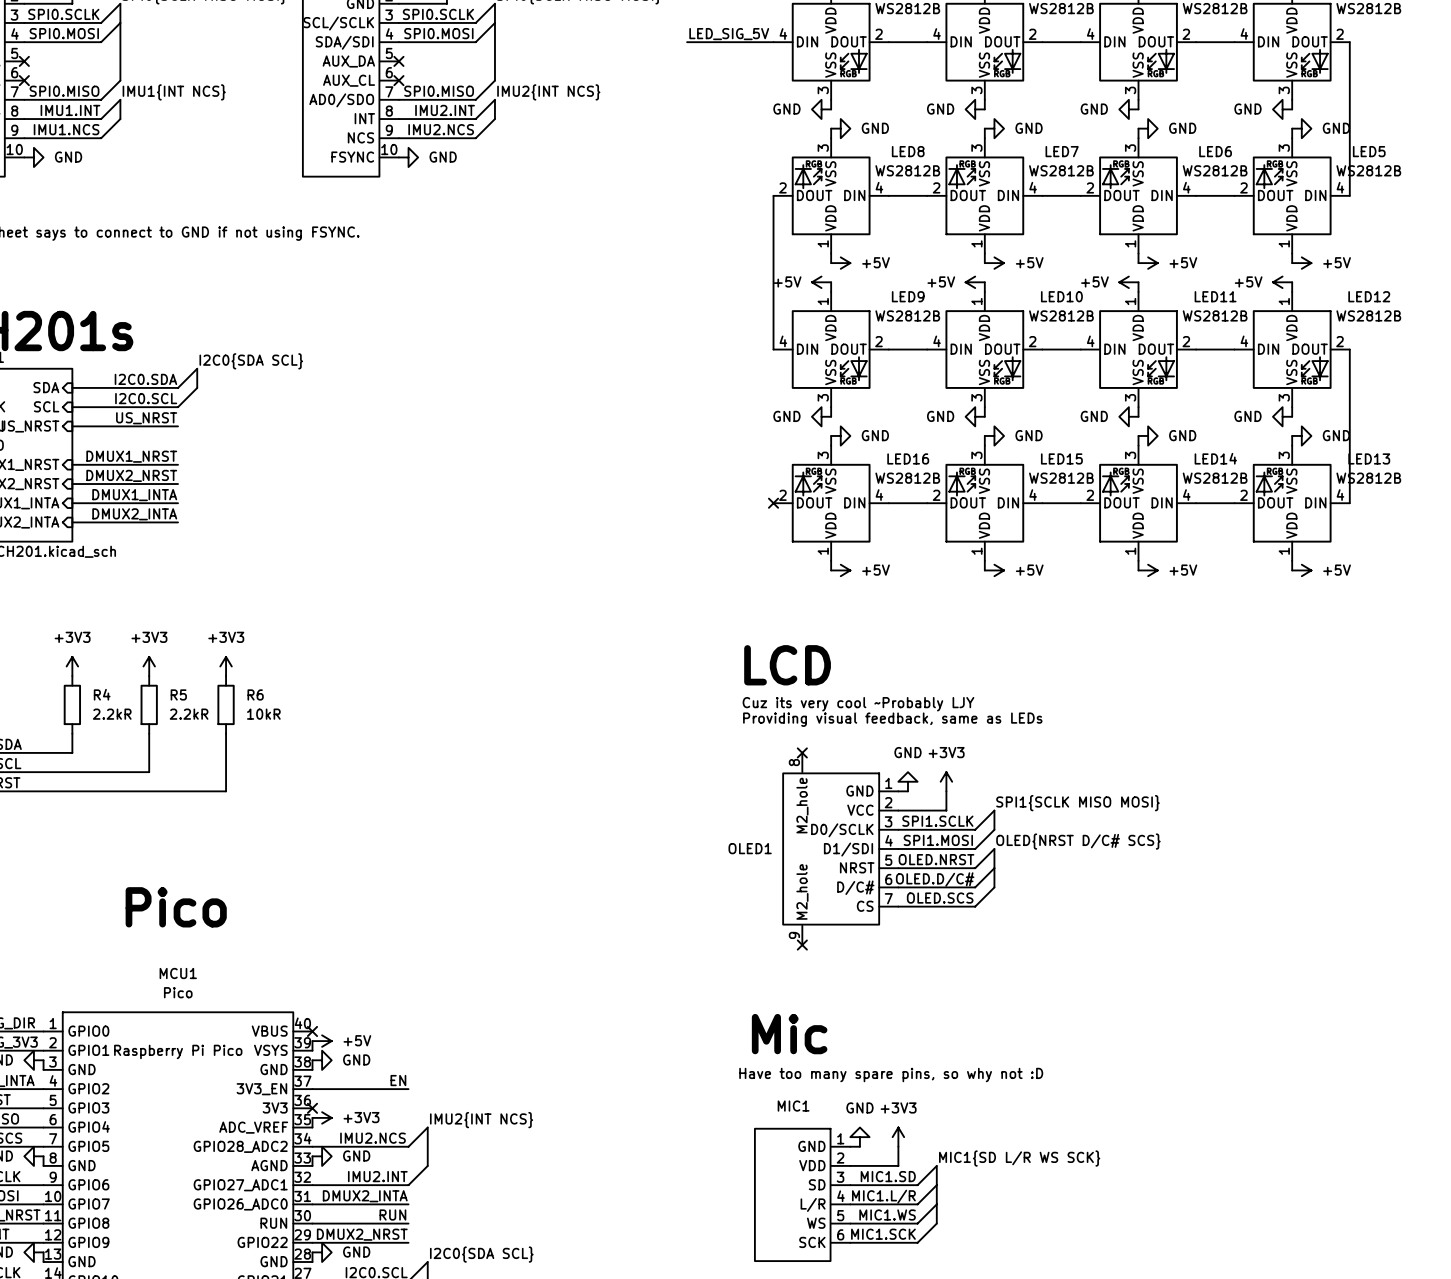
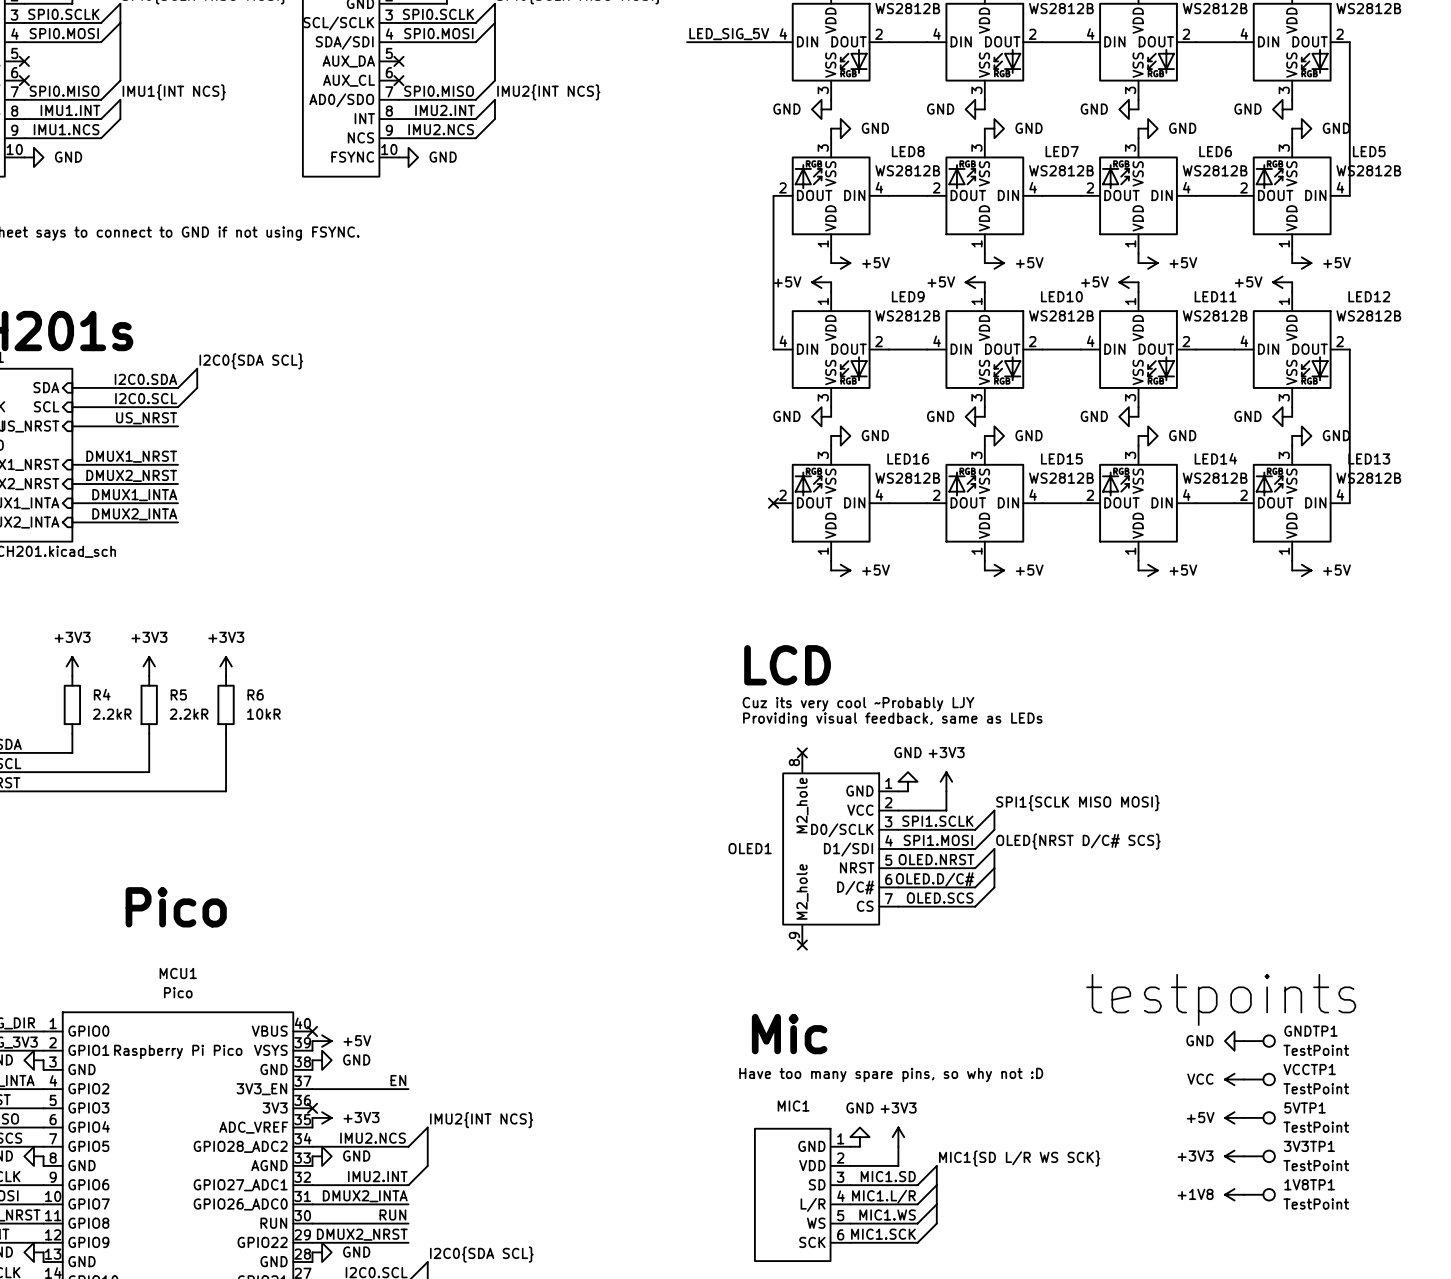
text: none -> testpoints (1221, 999)
power symbol: none -> GND (1234, 1041)
GNDTP1: none -> TestPoint (1259, 1041)
power symbol: none -> VCC (1234, 1079)
VCCTP1: none -> TestPoint (1259, 1079)
power symbol: none -> +5V (1234, 1117)
5VTP1: none -> TestPoint (1259, 1117)
power symbol: none -> +3V3 (1234, 1156)
3V3TP1: none -> TestPoint (1259, 1156)
power symbol: none -> +1V8 (1234, 1194)
1V8TP1: none -> TestPoint (1259, 1194)

